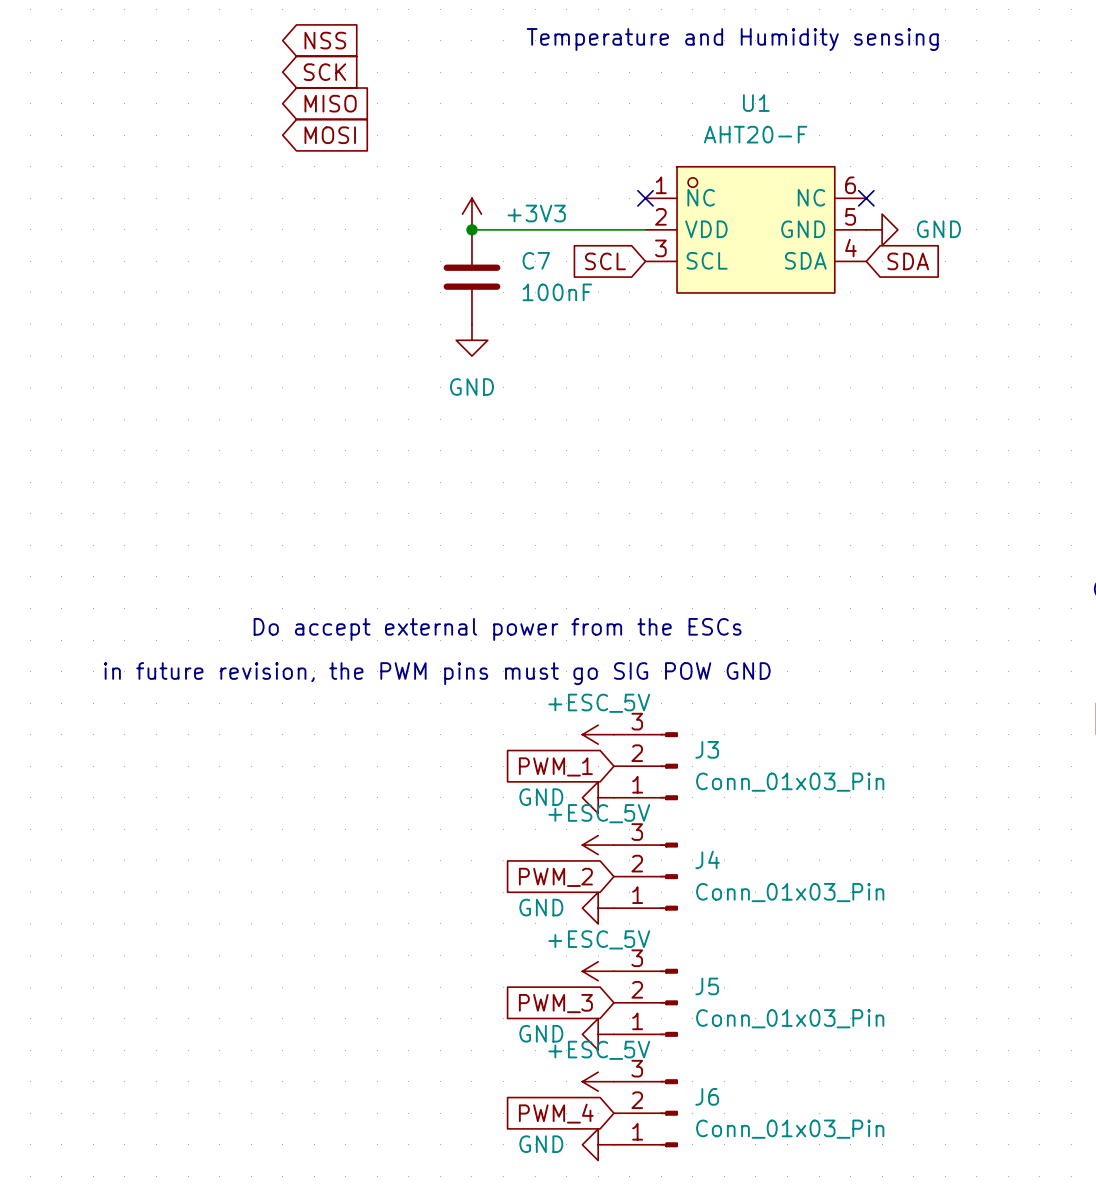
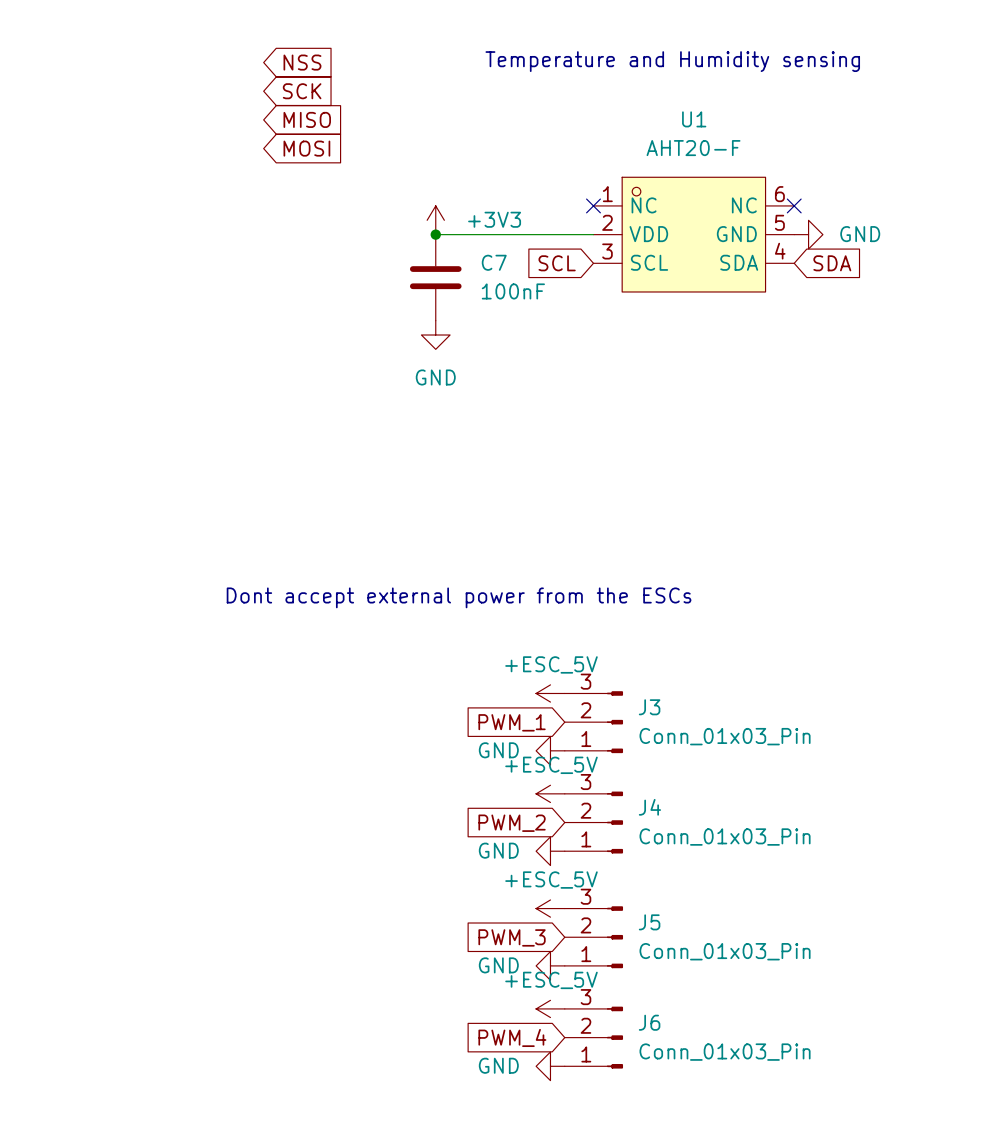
text: Do accept external power from the ESCs (497, 629) -> Dont accept external power from the ESCs (459, 597)
text: in future revision, the PWM pins must go SIG POW GND (437, 673) -> none

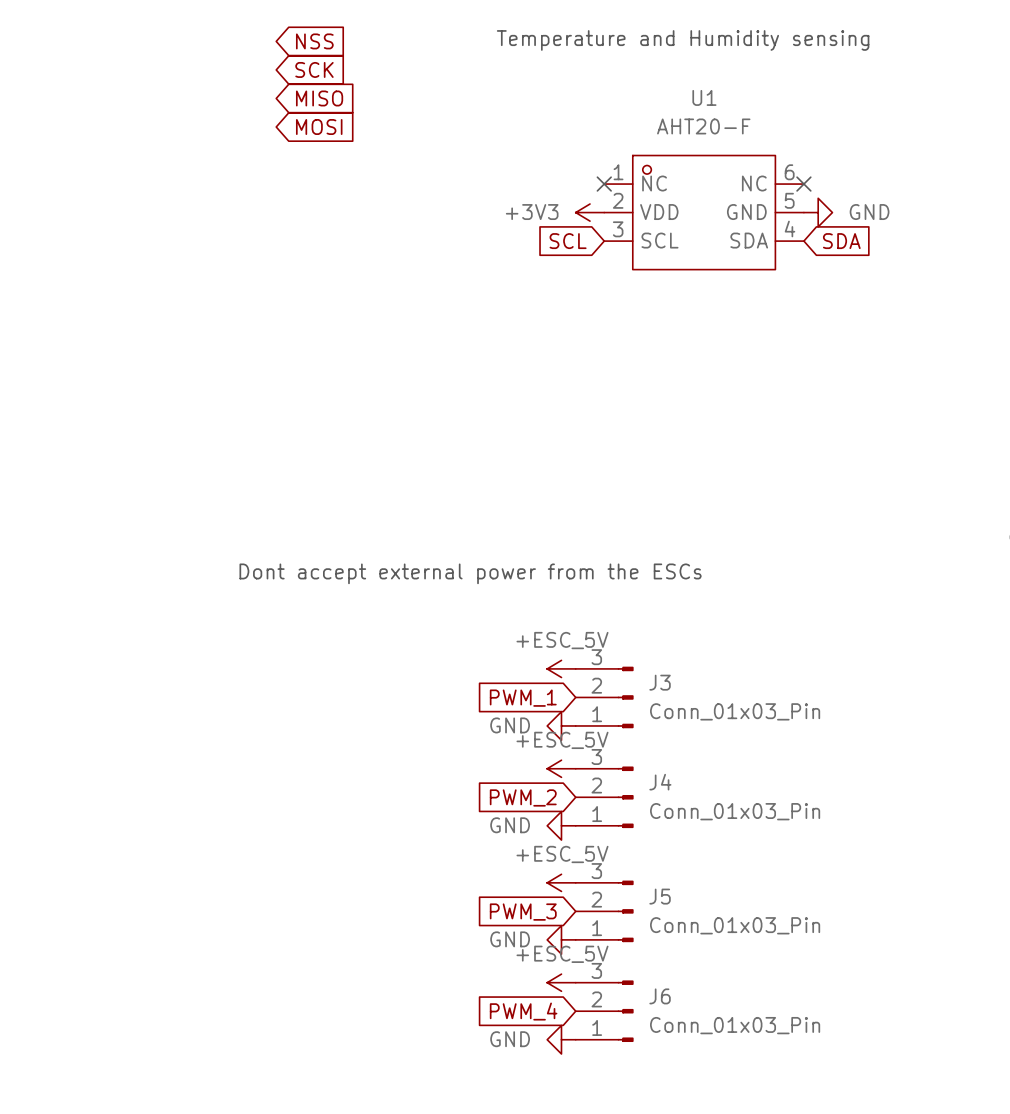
power symbol text position: +3V3 (494, 219) -> +3V3 (532, 212)
power symbol rotation: 0° (435, 220) -> 90° counterclockwise (590, 212)
power symbol position: +3V3 (435, 220) -> +3V3 (590, 212)
wire: (435, 234) (593, 234) -> none
junction: (435, 234) -> none
C7: 100nF (435, 277) -> none
power symbol: GND (435, 335) -> none

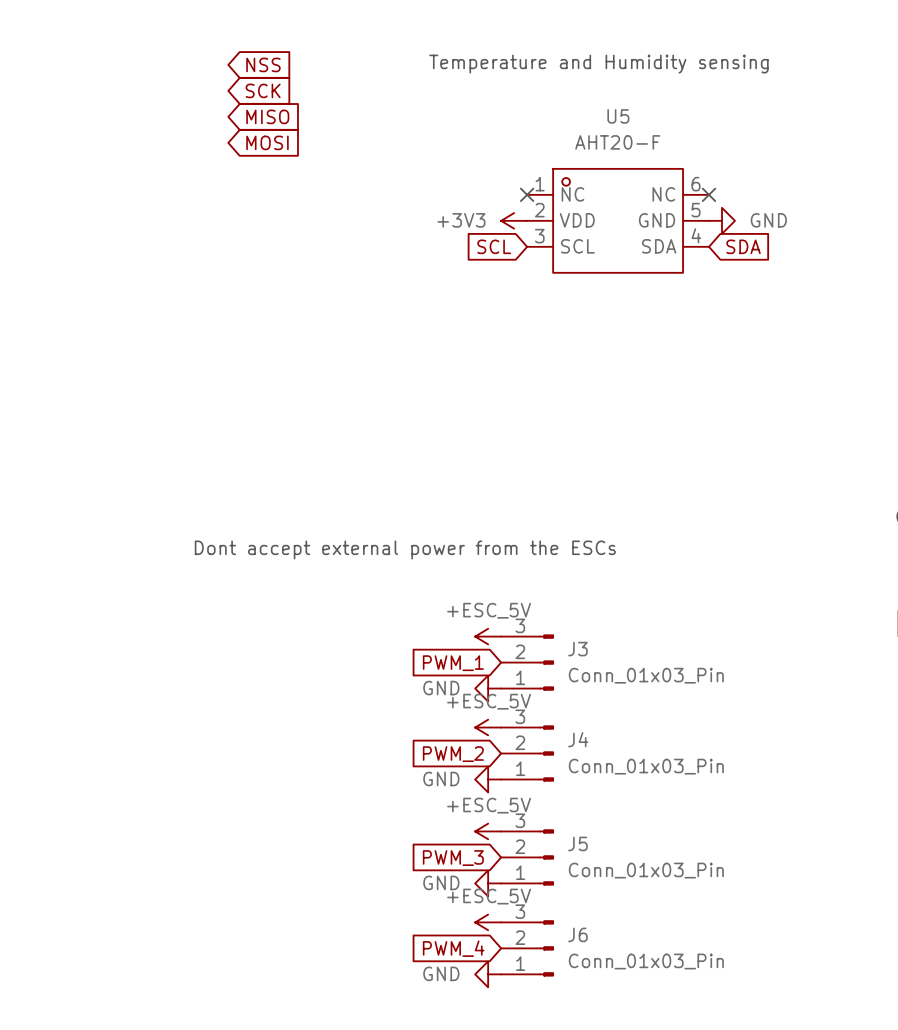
U1 name: U1 (704, 97) -> U5 (618, 116)

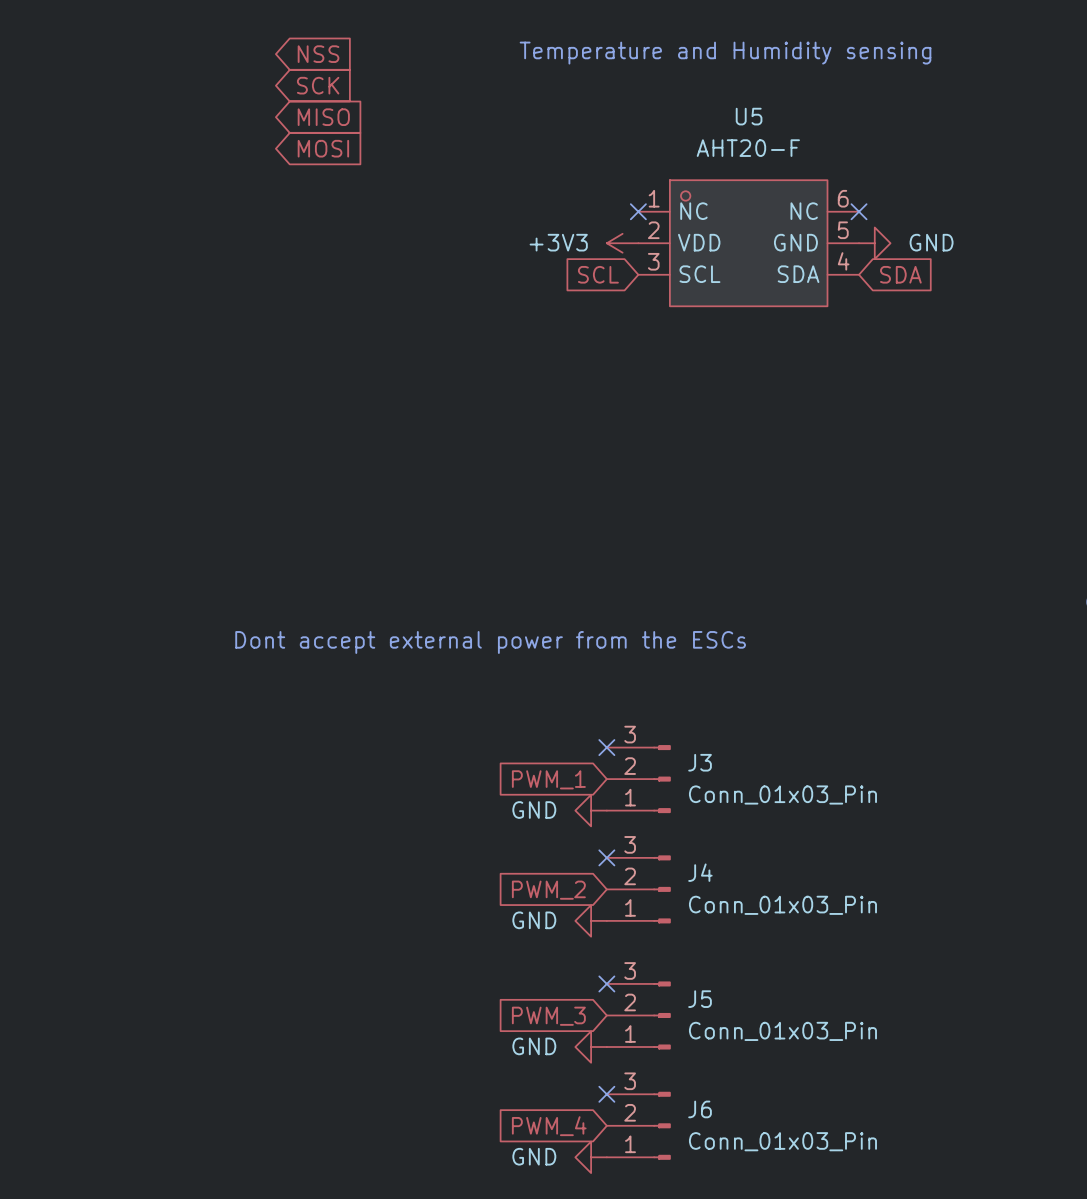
power symbol: +ESC_5V (488, 636) -> none
no-connect mark: none -> (606, 747)
power symbol: +ESC_5V (488, 727) -> none
no-connect mark: none -> (606, 857)
power symbol: +ESC_5V (488, 831) -> none
no-connect mark: none -> (606, 983)
power symbol: +ESC_5V (488, 922) -> none
no-connect mark: none -> (606, 1094)

